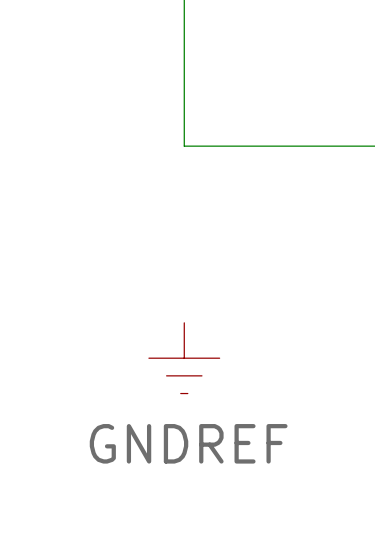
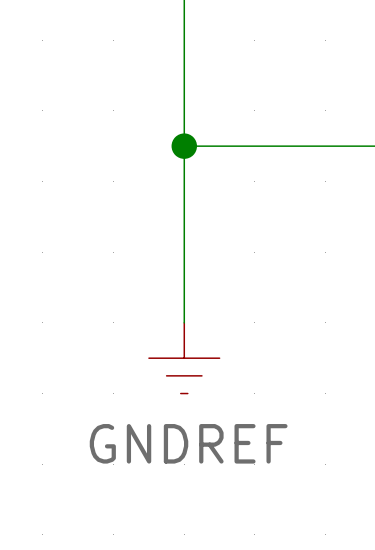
wire: none -> (184, 146) (184, 322)
junction: none -> (184, 146)

